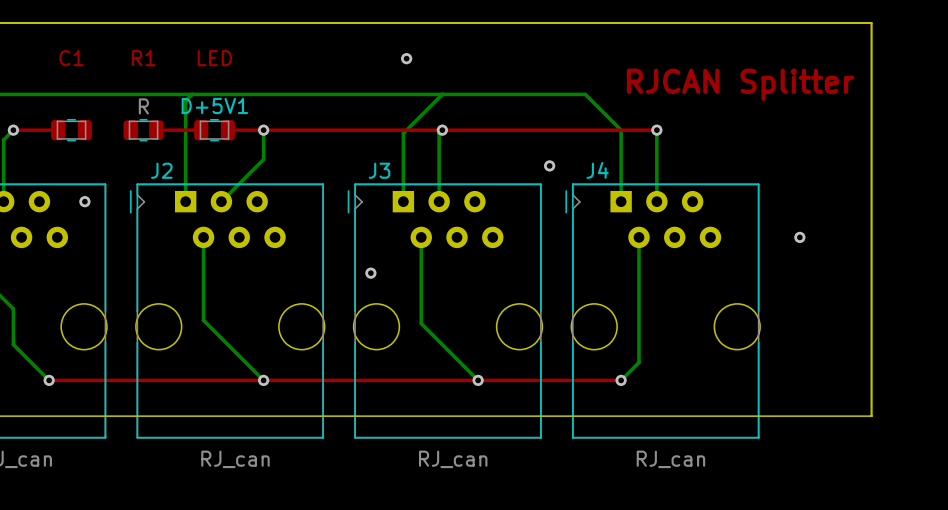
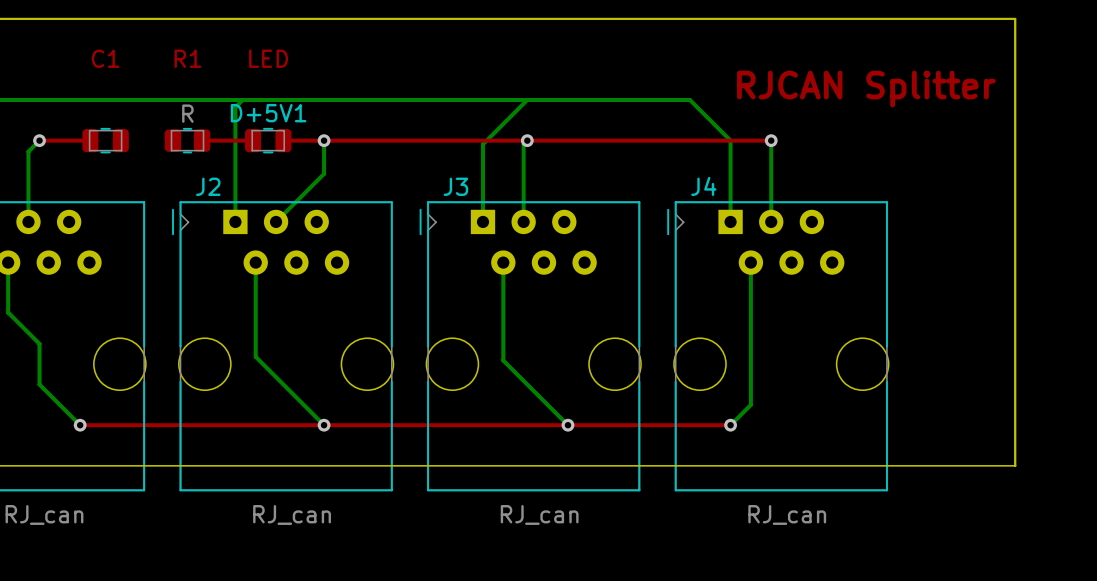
via: (406, 58) -> none
via: (549, 165) -> none
via: (84, 201) -> none
via: (799, 237) -> none
via: (370, 273) -> none

